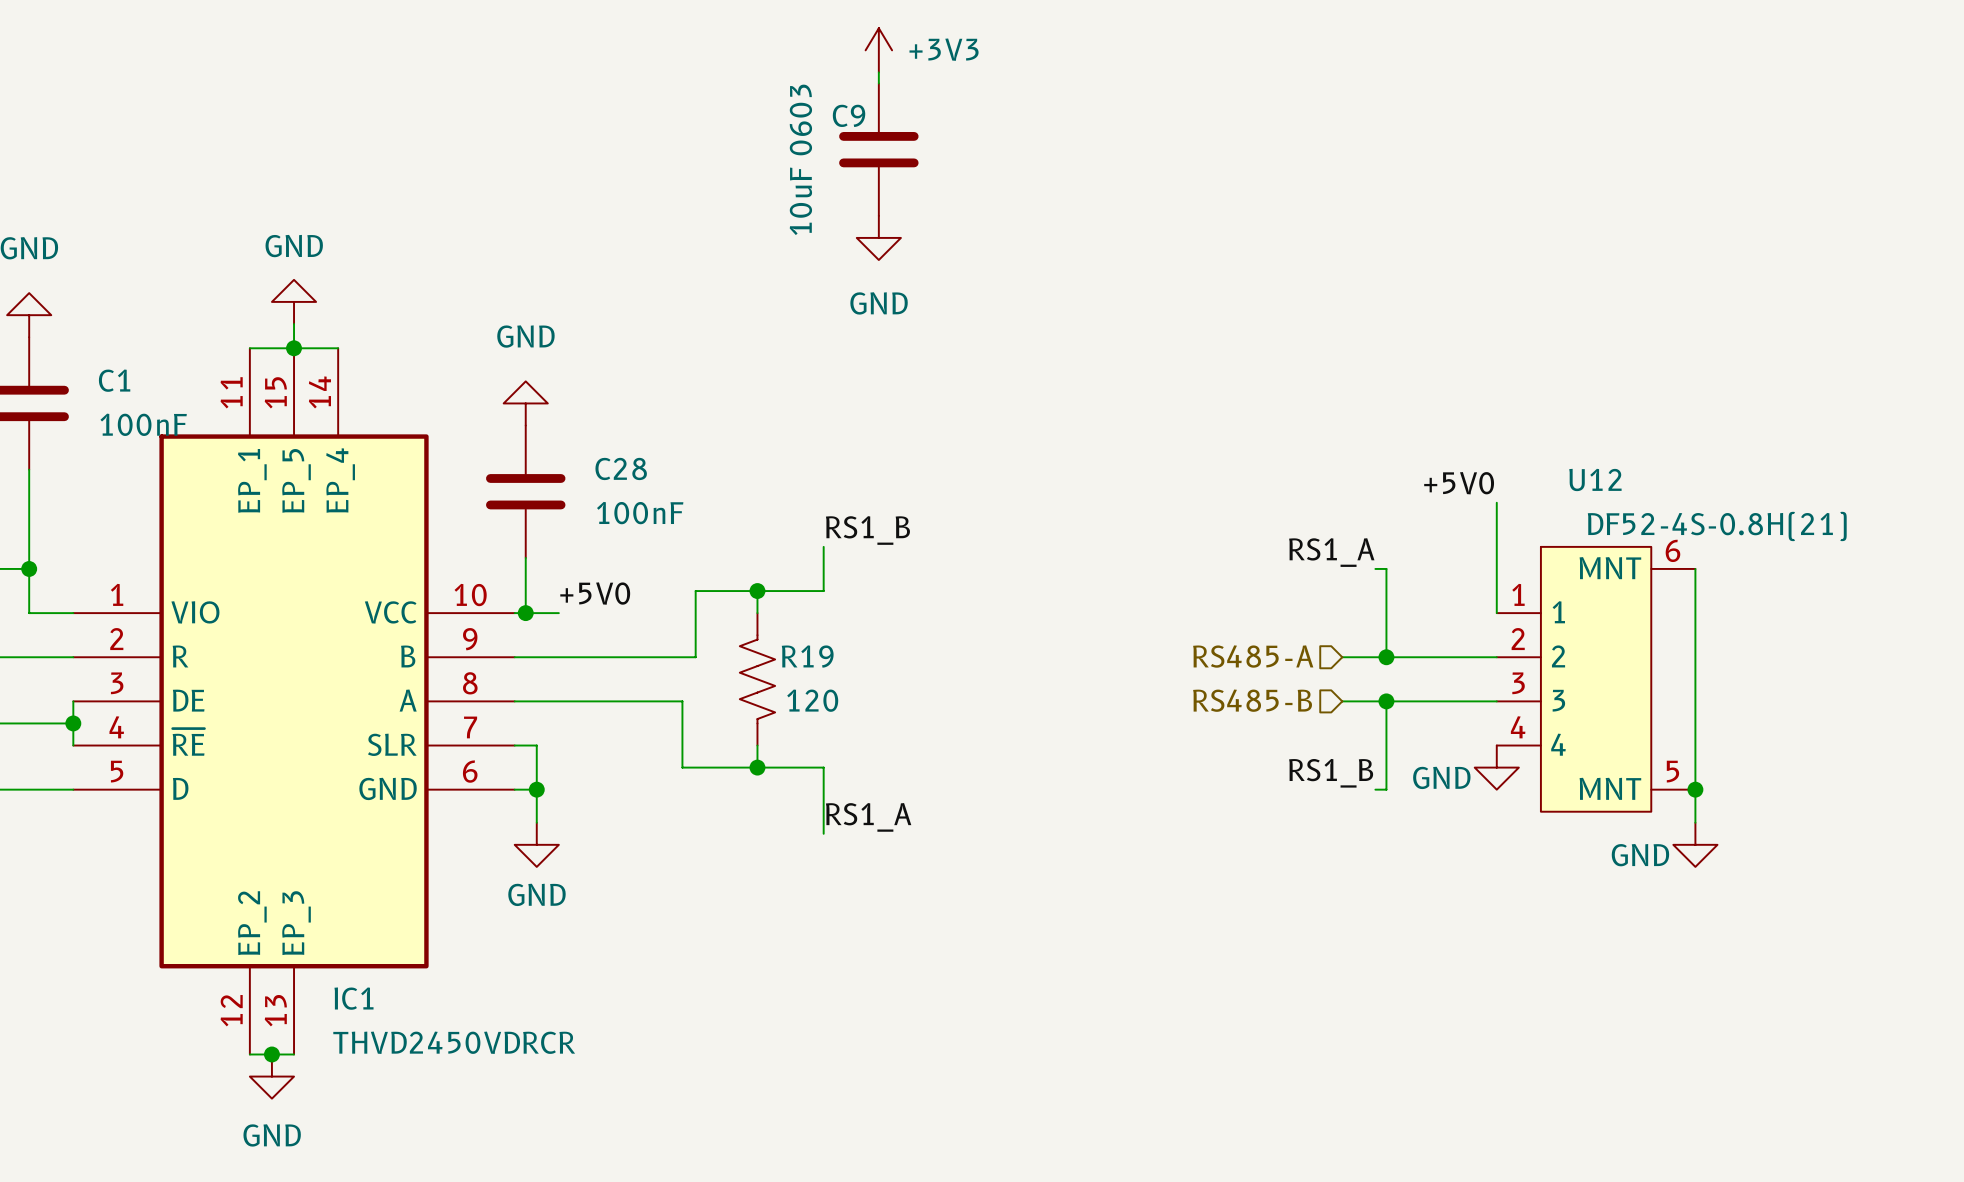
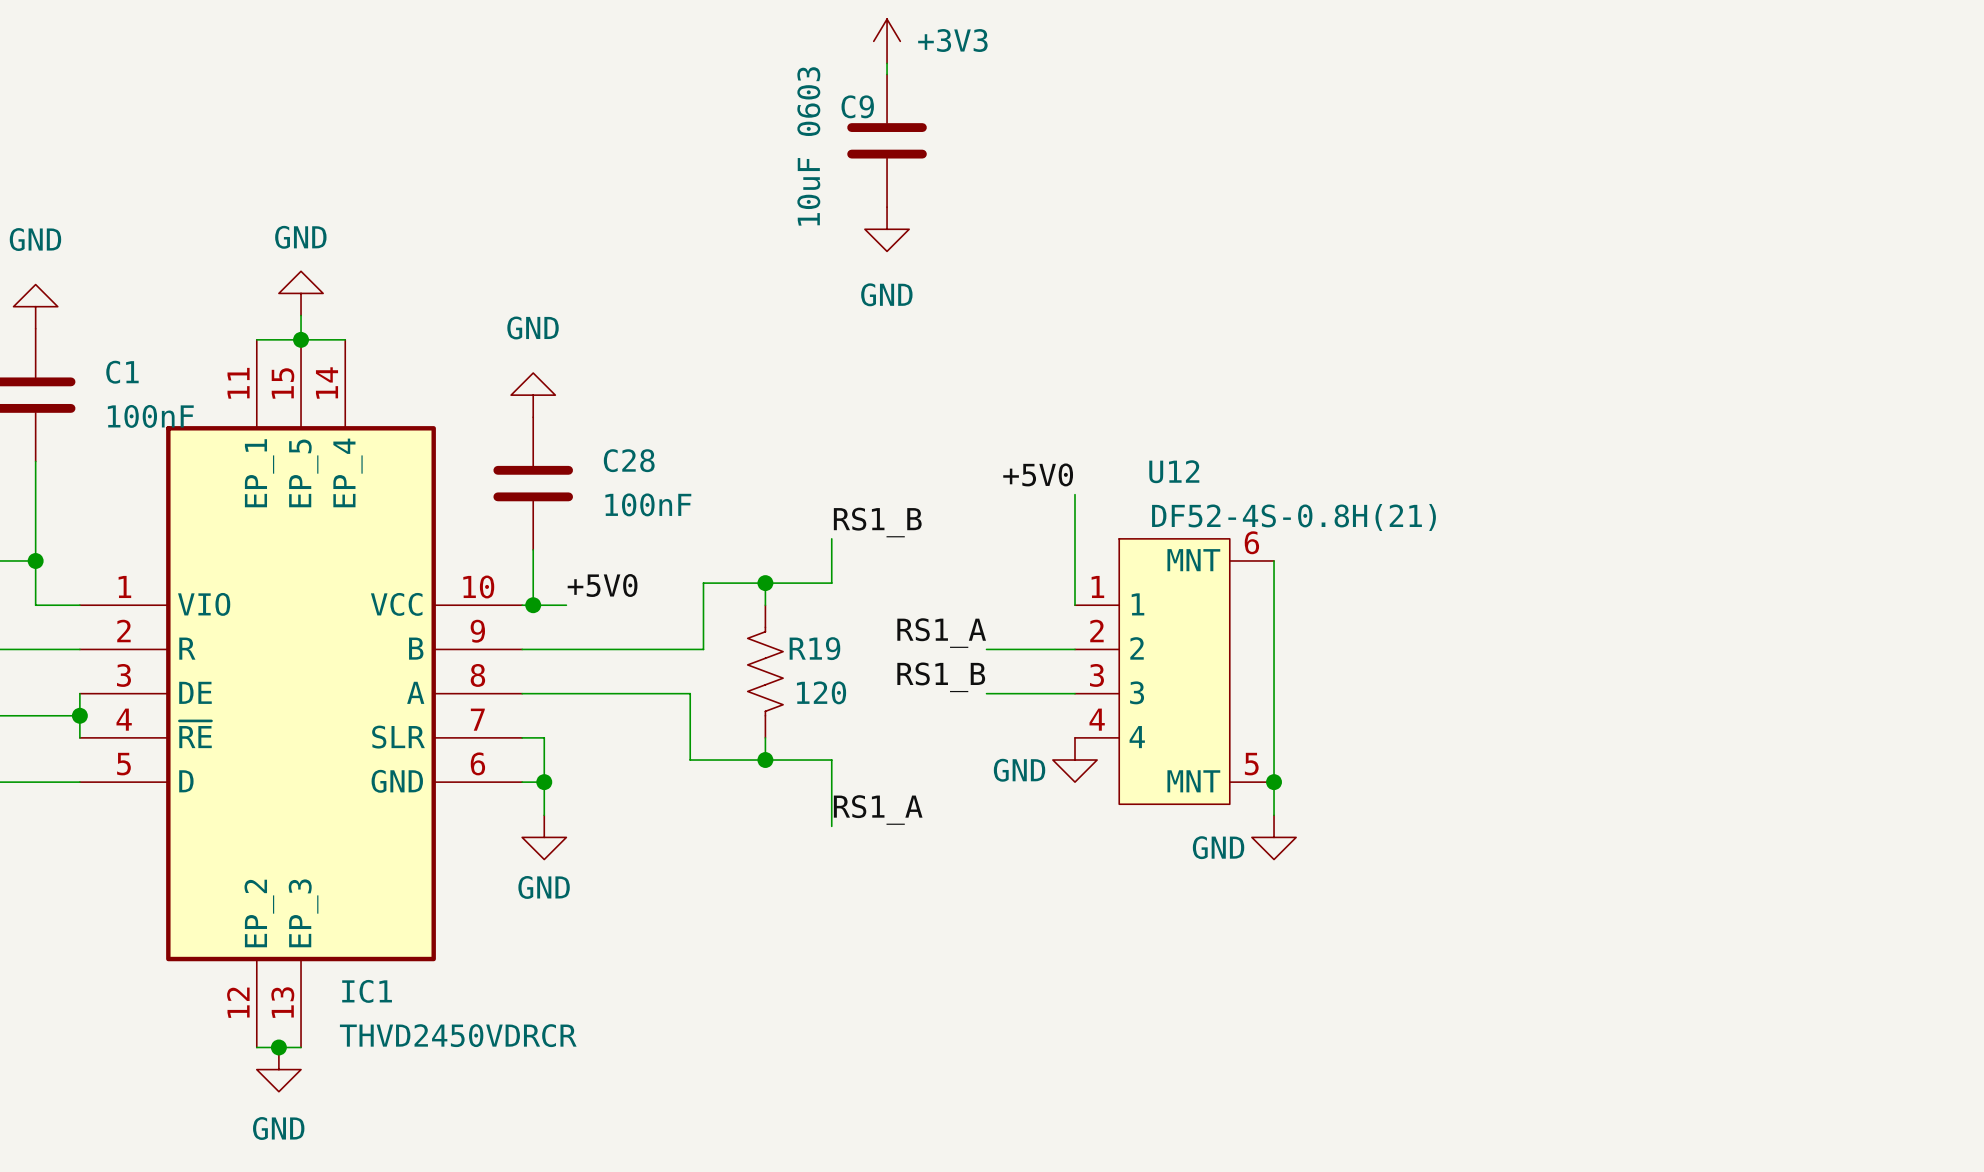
label position: +5V0 (1459, 483) -> +5V0 (1038, 474)
wire: (1496, 502) (1496, 613) -> (1074, 494) (1074, 605)
label position: RS1_A (1331, 552) -> RS1_A (941, 633)
wire: (1375, 568) (1386, 568) (1386, 657) -> none
wire: (1695, 568) (1695, 822) -> (1274, 560) (1274, 815)
hierarchical label: RS485-A (1253, 656) -> none
wire: none -> (986, 649) (1074, 649)
wire: (1342, 657) (1496, 657) -> none
junction: (1386, 657) -> none
U12 position: (1596, 679) -> (1174, 671)
hierarchical label: RS485-B (1252, 700) -> none
wire: none -> (986, 693) (1074, 693)
wire: (1342, 701) (1496, 701) -> none
wire: (1386, 701) (1386, 789) (1375, 789) -> none
junction: (1386, 701) -> none
power symbol: none -> GND (1074, 760)
power symbol: GND (1496, 767) -> none
label position: RS1_B (1331, 773) -> RS1_B (941, 677)
junction: none -> (1274, 782)
junction: (1695, 789) -> none
power symbol: none -> GND (1274, 837)
power symbol: GND (1695, 844) -> none

